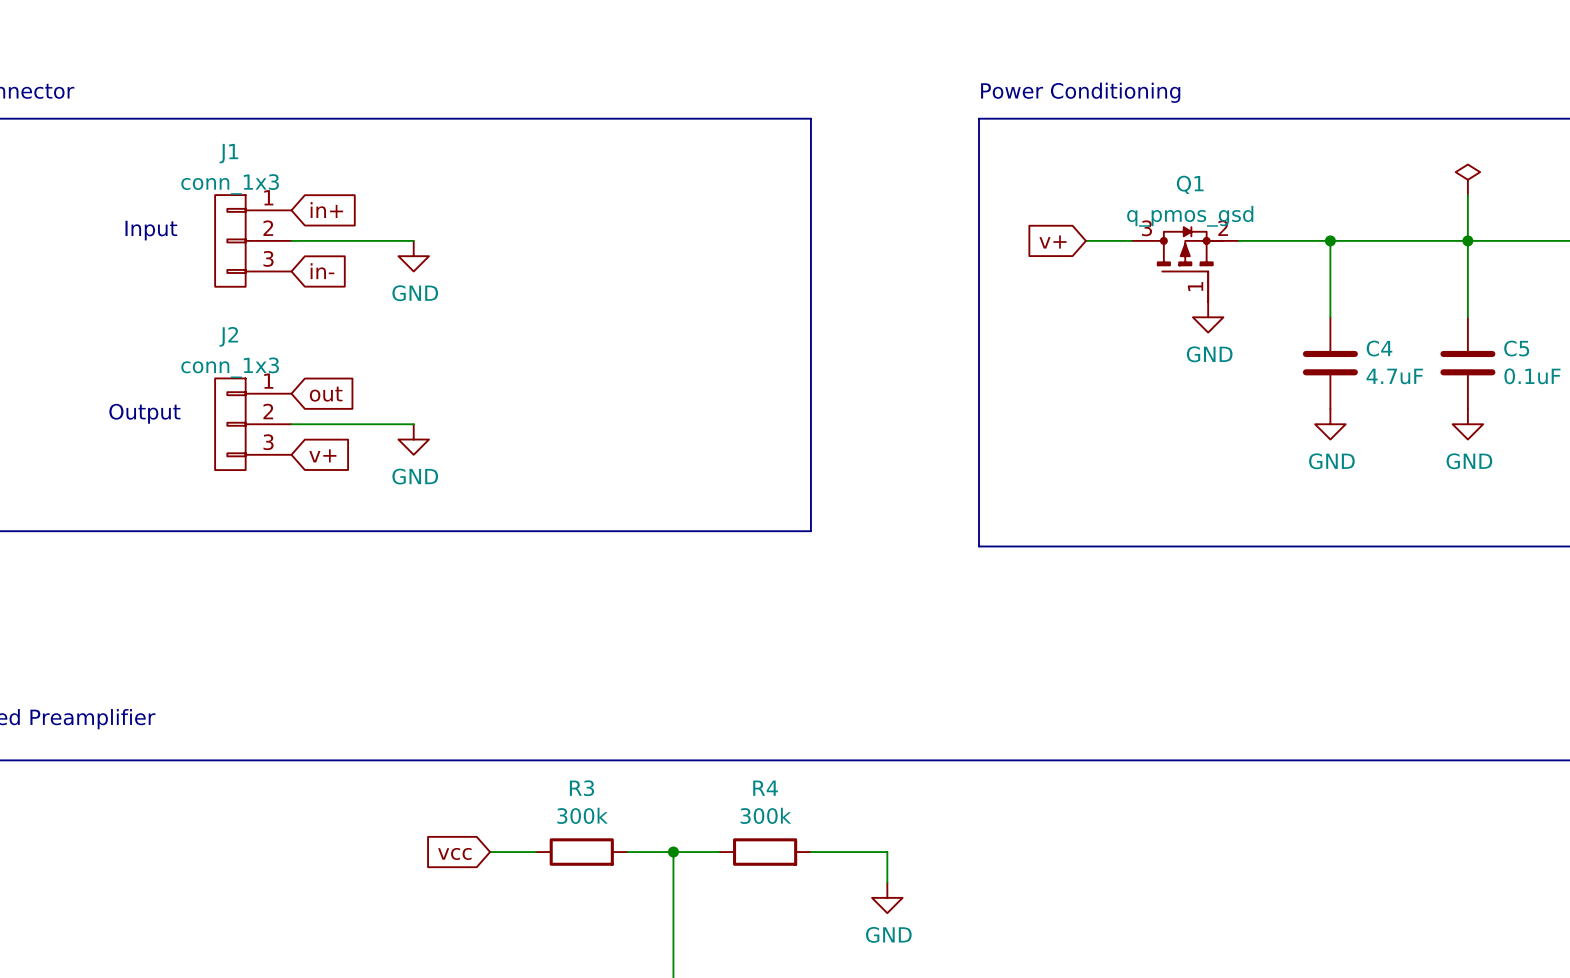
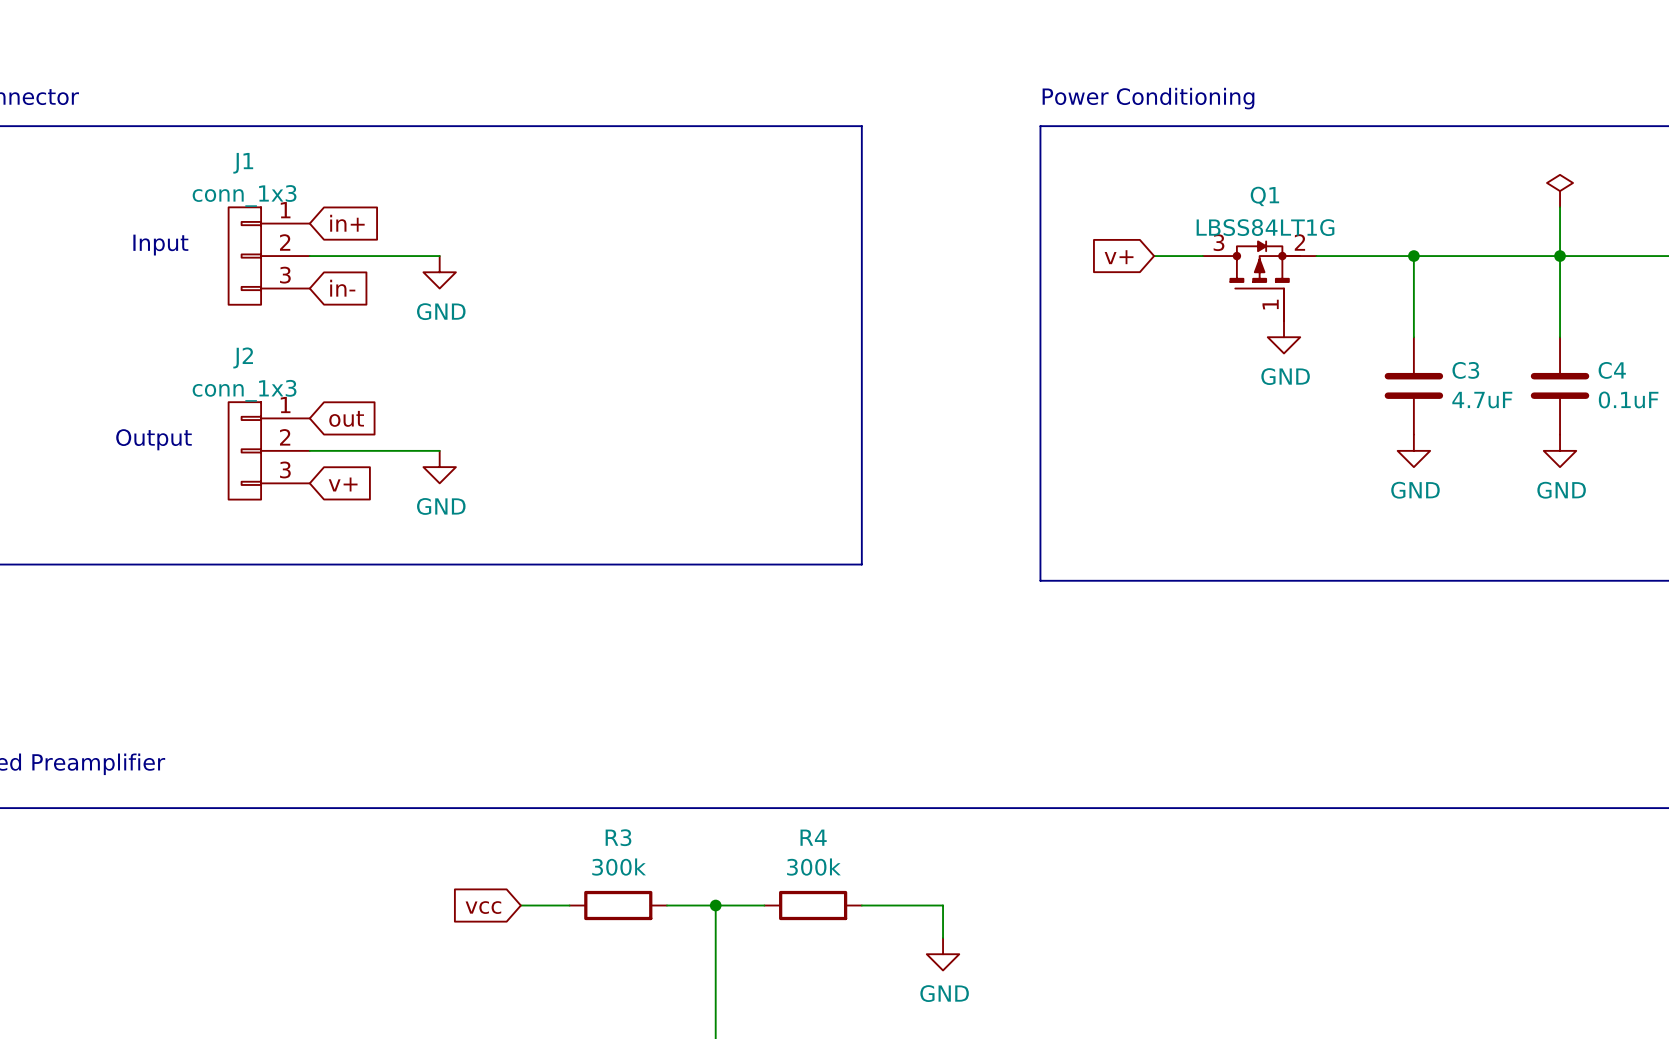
Q1 value: q_pmos_gsd (1190, 216) -> LBSS84LT1G (1265, 227)
C4 name: C4 (1379, 348) -> C3 (1465, 370)
C5 name: C5 (1516, 348) -> C4 (1612, 370)

